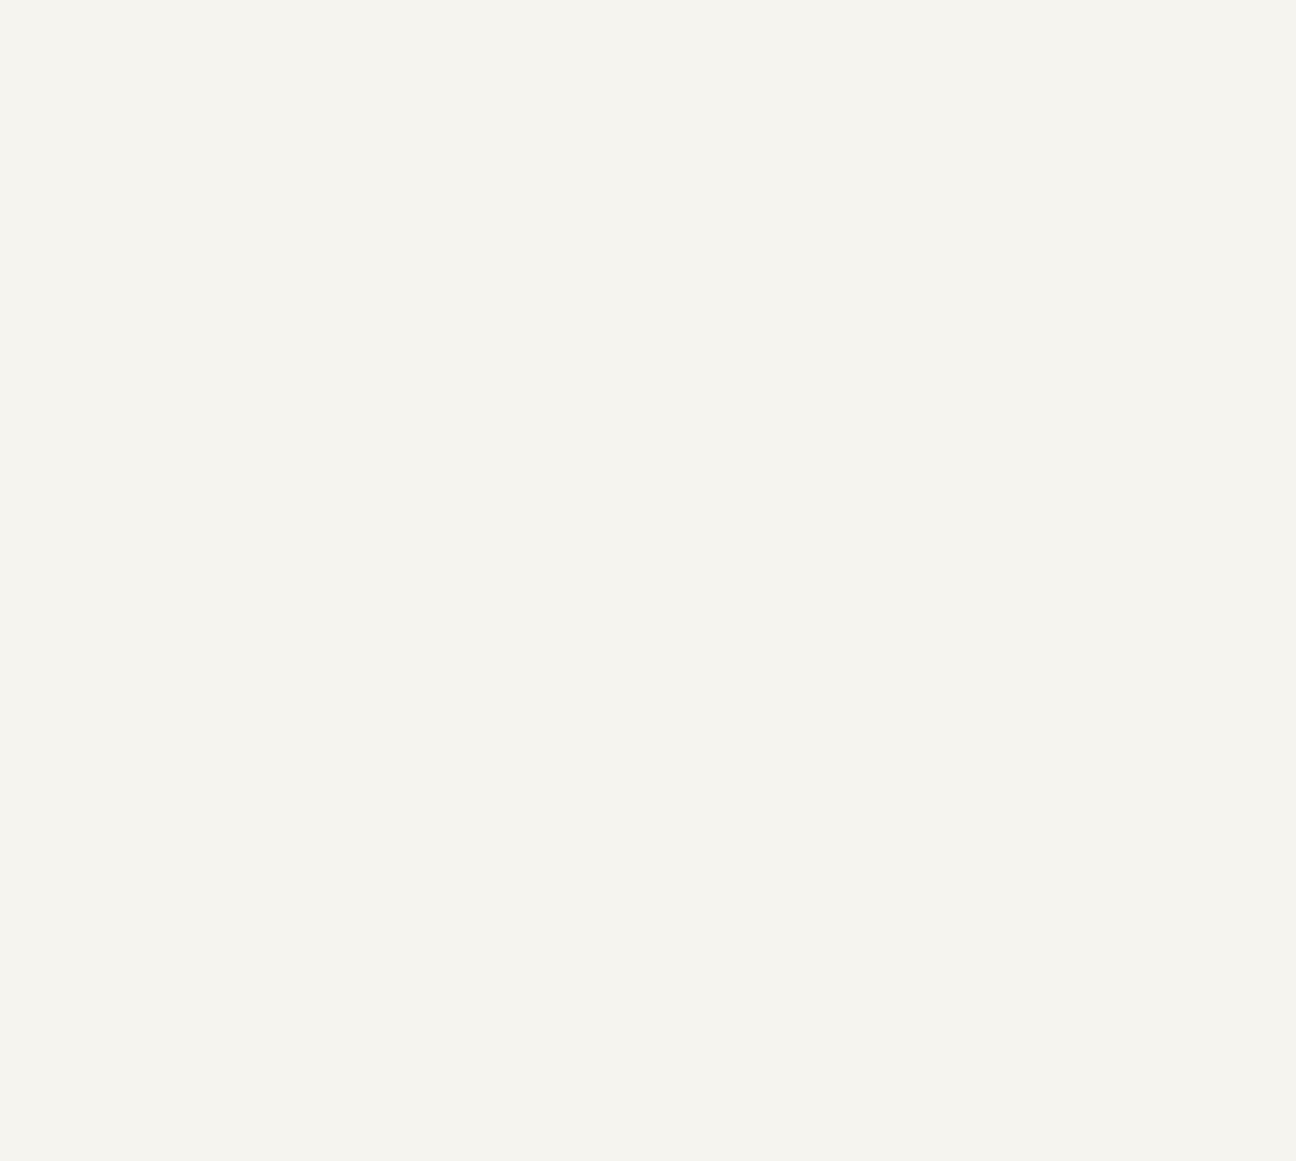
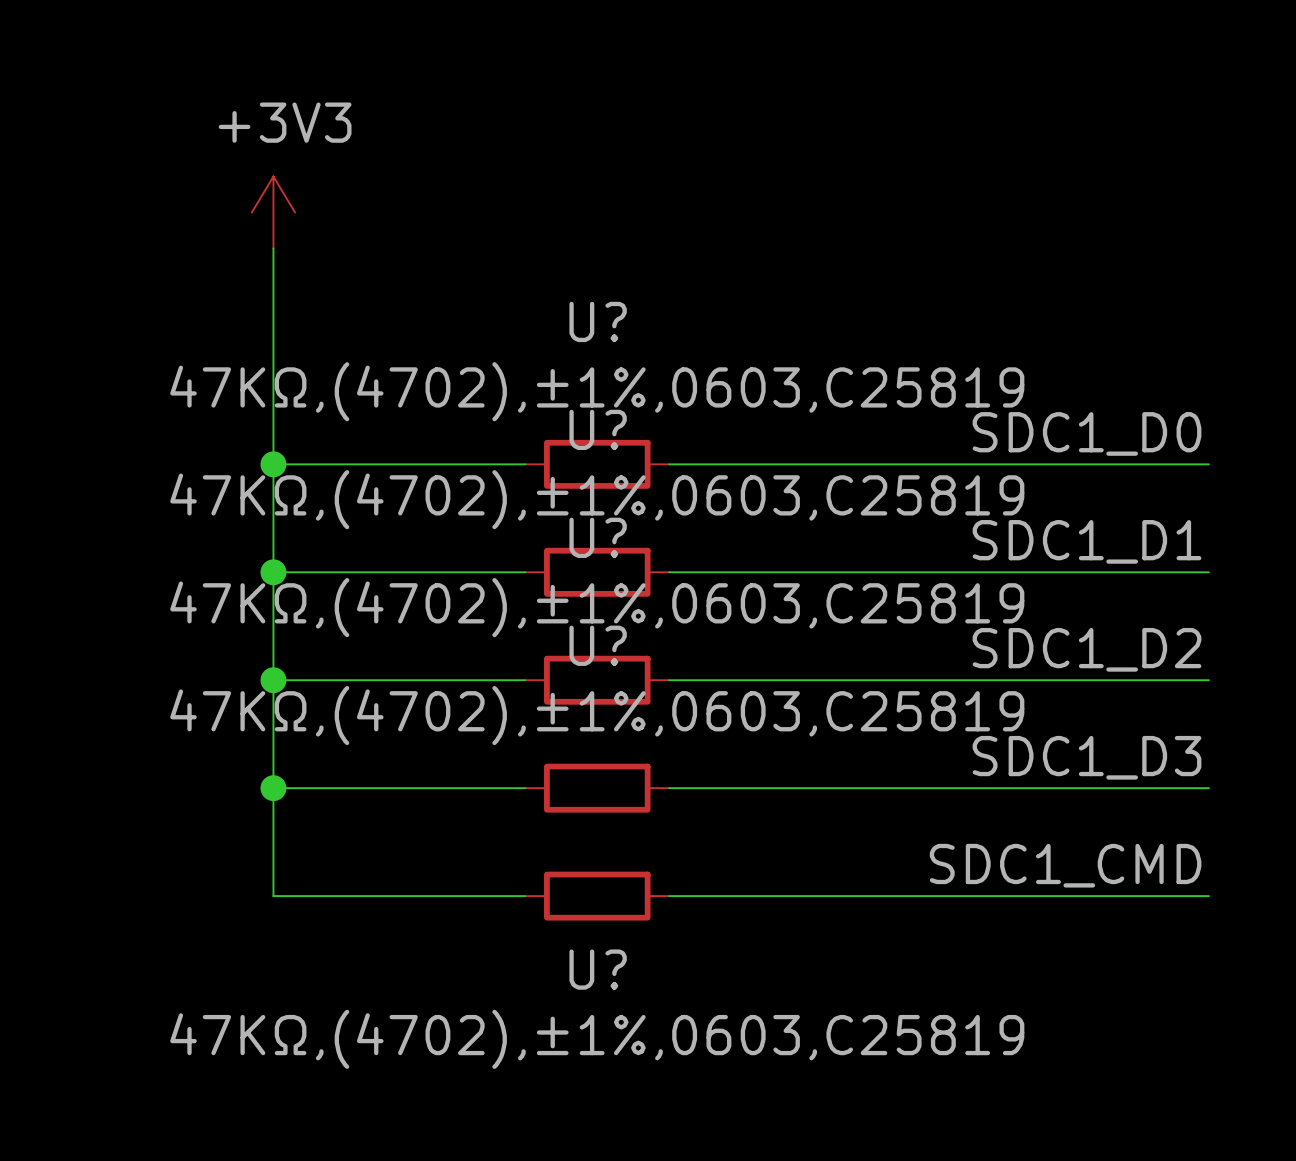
power symbol: none -> +3V3 (273, 212)
wire: none -> (273, 248) (273, 896) (525, 896)
label: none -> SDC1_D0 (1087, 433)
wire: none -> (273, 464) (525, 464)
junction: none -> (273, 464)
U?: none -> 47KΩ,(4702),±1%,0603,C25819 (597, 464)
wire: none -> (669, 464) (1208, 464)
label: none -> SDC1_D1 (1087, 541)
wire: none -> (273, 572) (525, 572)
junction: none -> (273, 572)
U?: none -> 47KΩ,(4702),±1%,0603,C25819 (597, 572)
wire: none -> (669, 572) (1208, 572)
label: none -> SDC1_D2 (1087, 649)
wire: none -> (273, 680) (525, 680)
junction: none -> (273, 680)
U?: none -> 47KΩ,(4702),±1%,0603,C25819 (597, 680)
wire: none -> (669, 680) (1208, 680)
label: none -> SDC1_D3 (1087, 757)
wire: none -> (273, 788) (525, 788)
junction: none -> (273, 788)
U?: none -> 47KΩ,(4702),±1%,0603,C25819 (597, 788)
wire: none -> (669, 788) (1208, 788)
label: none -> SDC1_CMD (1065, 865)
U?: none -> 47KΩ,(4702),±1%,0603,C25819 (597, 896)
wire: none -> (669, 896) (1208, 896)

